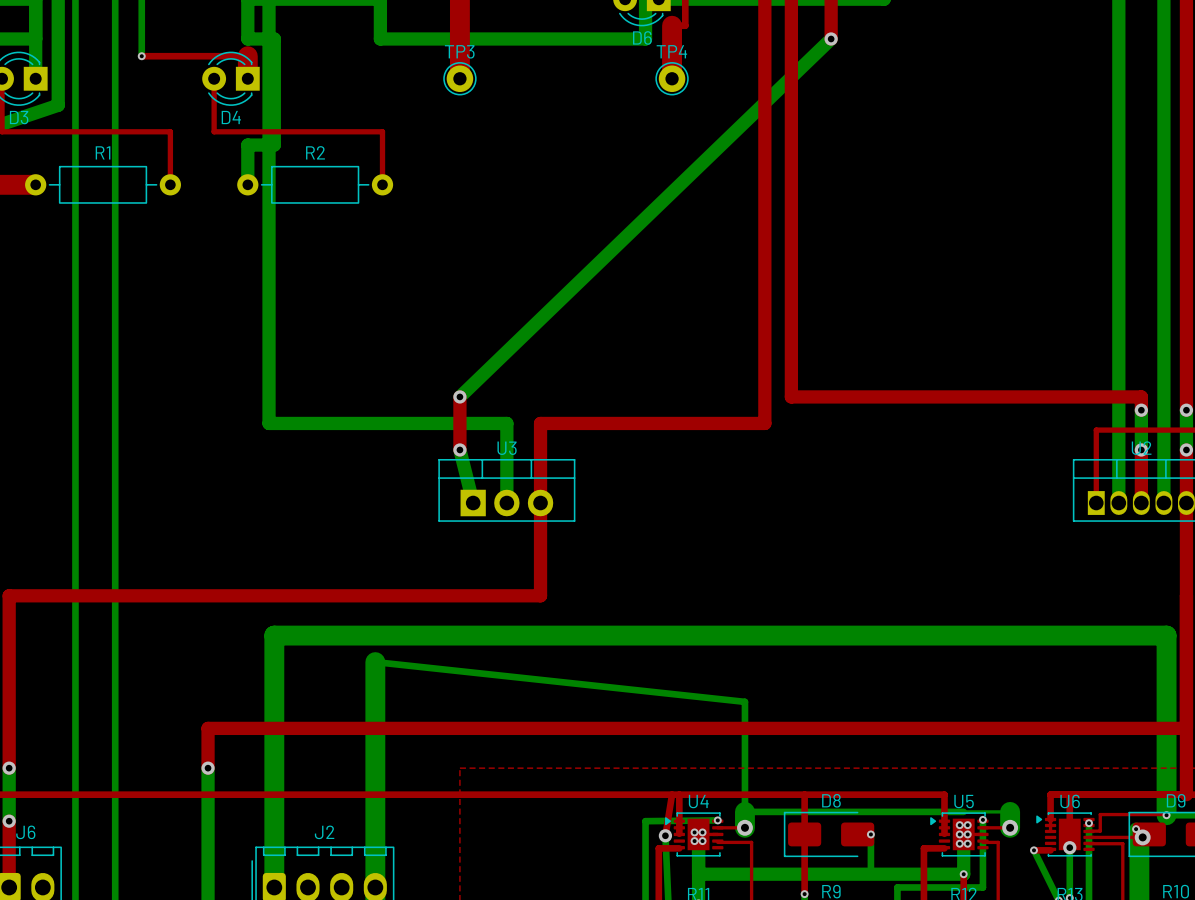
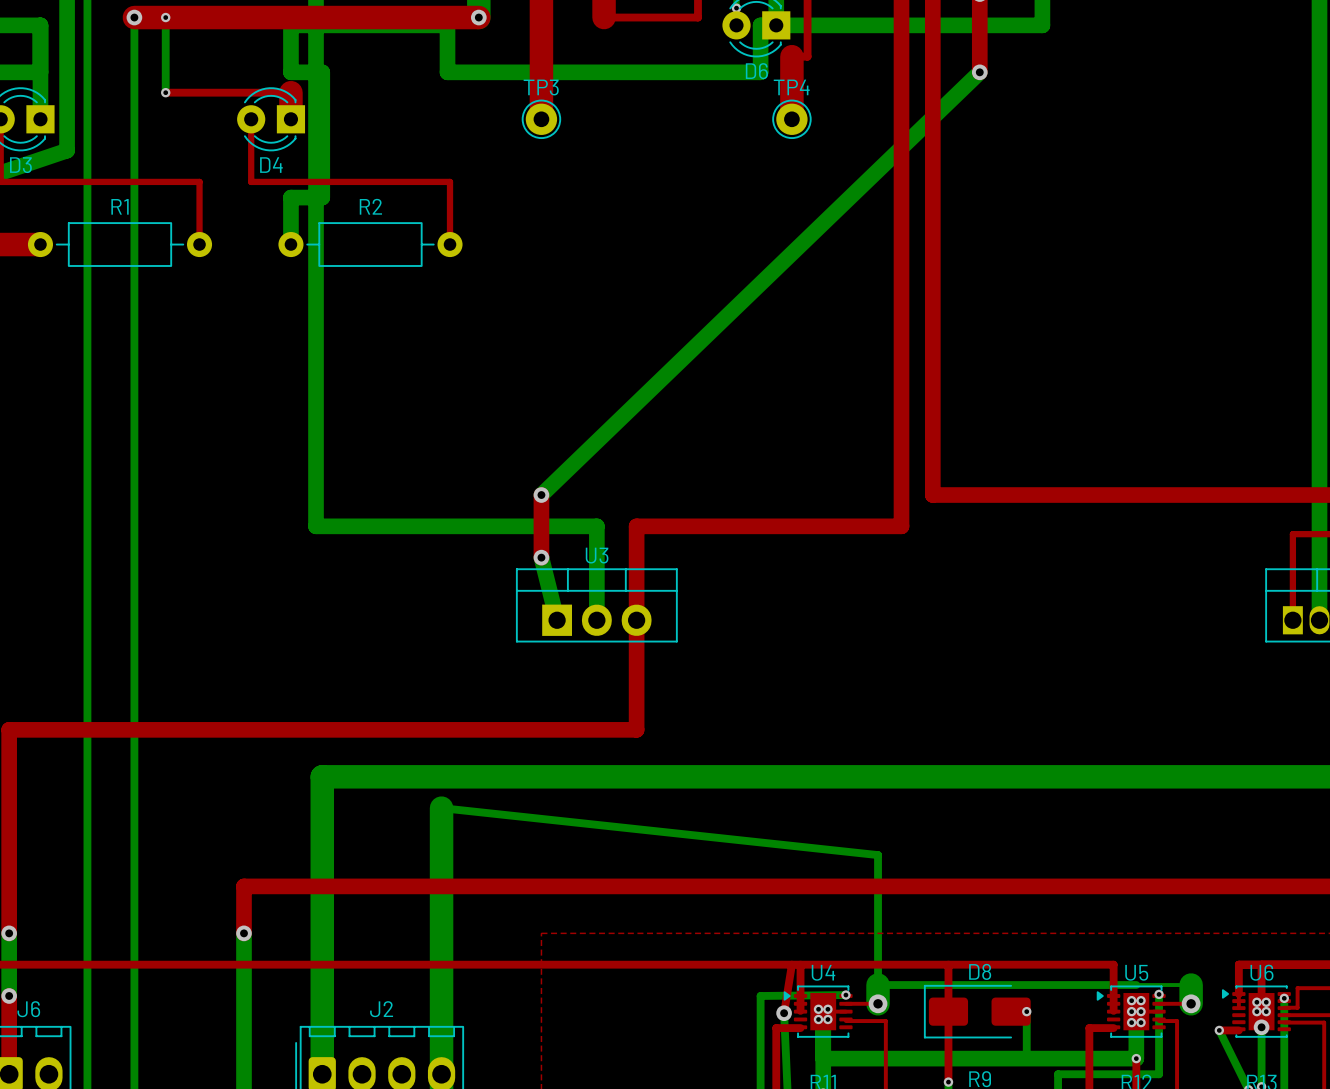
via: none -> (1256, 1002)
via: none -> (1266, 1002)
via: none -> (1256, 1011)
via: none -> (1266, 1011)

